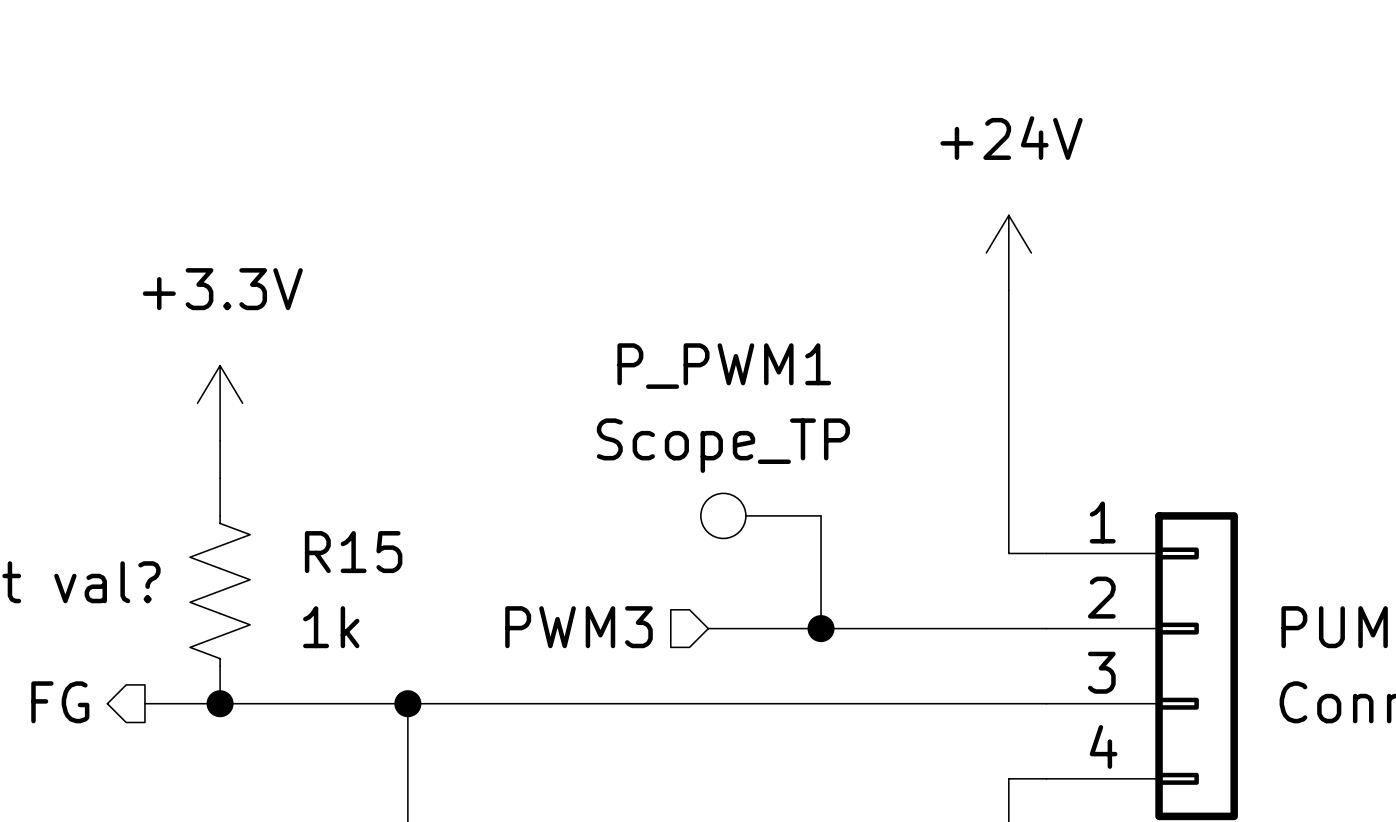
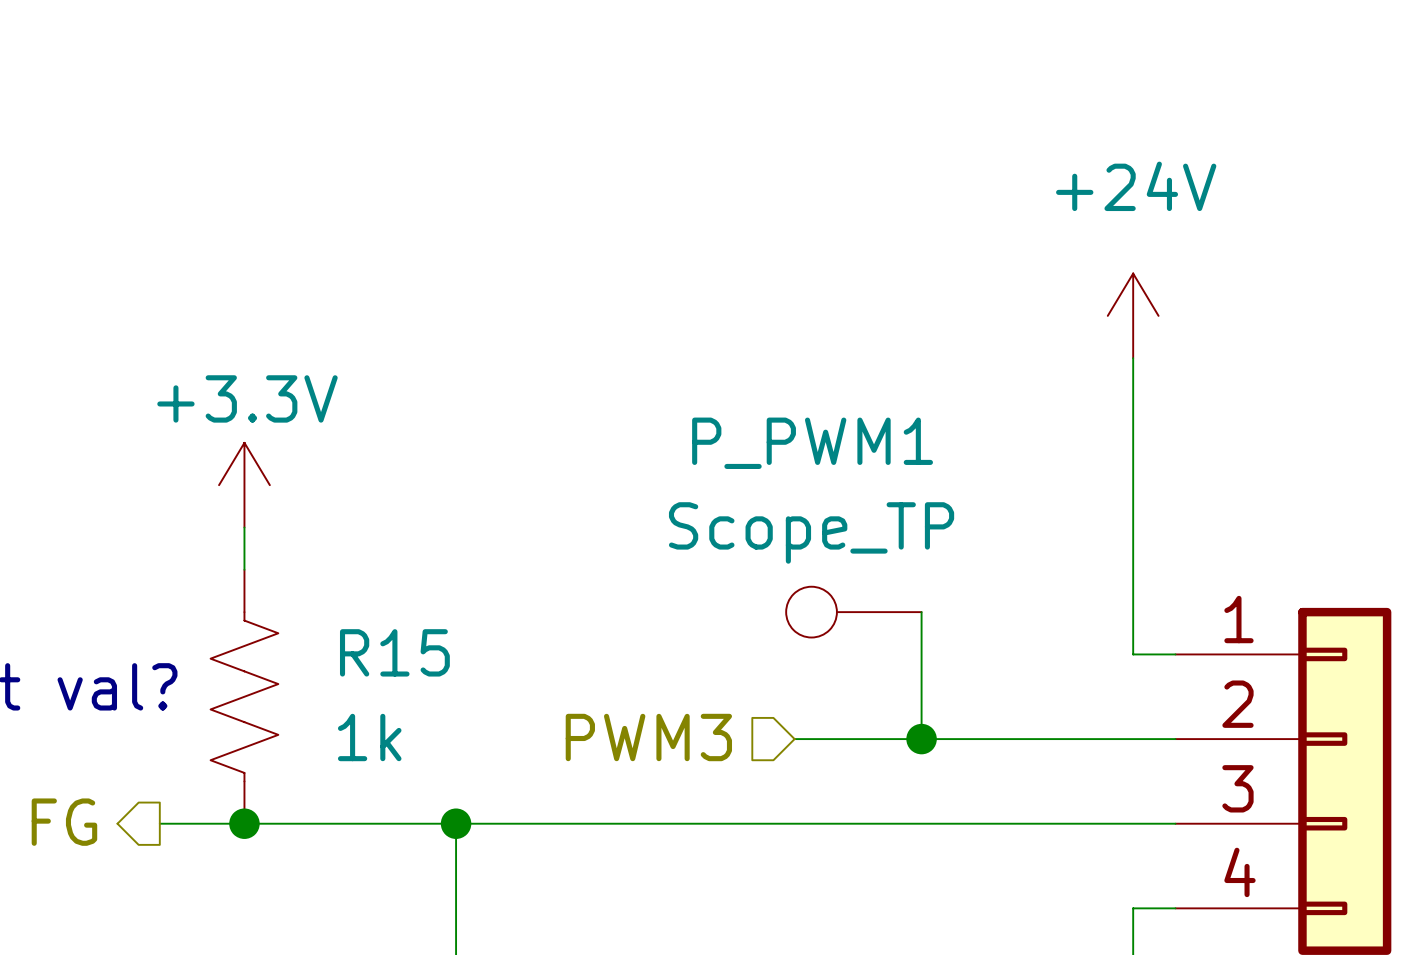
power symbol text position: +3.3V (222, 289) -> +3.3V (247, 398)

